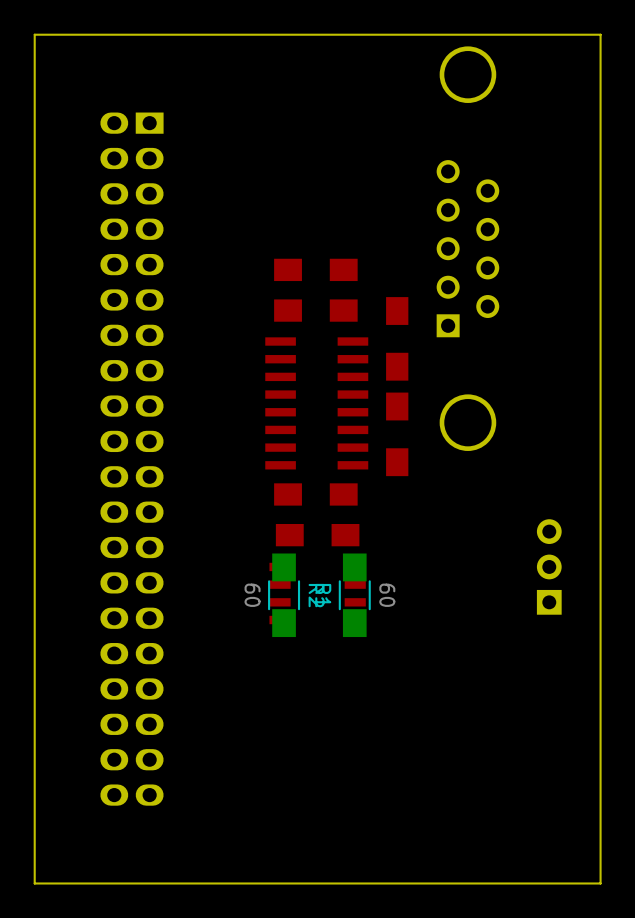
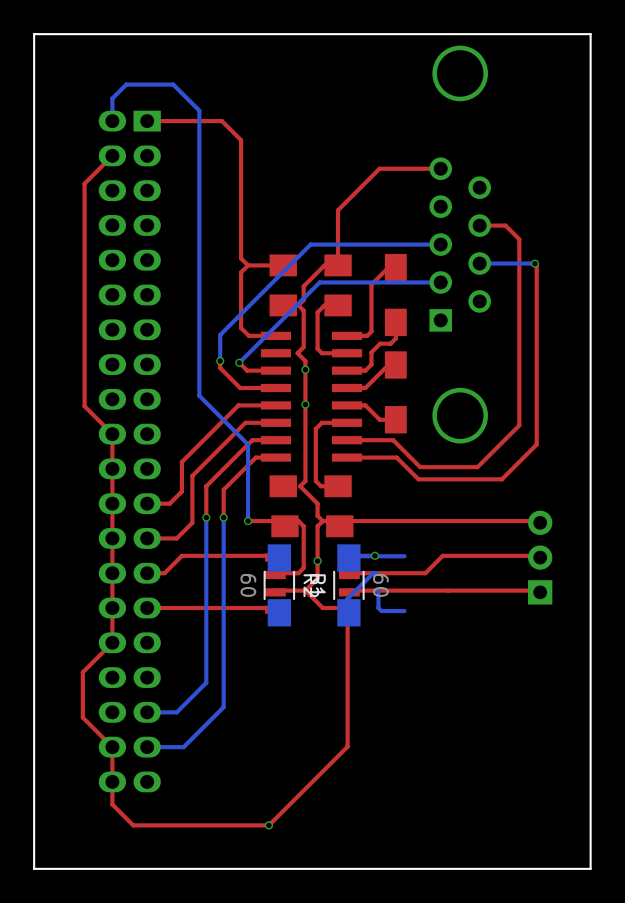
bottom track: none -> (112, 121) (112, 98) (126, 84) (173, 84) (199, 110) (199, 395) (248, 444) (248, 521)
top track: none -> (147, 121) (221, 121) (241, 140) (241, 258) (248, 265)
top track: none -> (112, 155) (84, 183) (84, 406) (112, 434) (112, 642) (82, 672) (82, 717) (112, 747) (112, 804) (133, 825) (268, 825) (347, 746) (347, 608) (322, 608) (305, 590)
top track: none -> (440, 168) (379, 168) (338, 210) (338, 265) (324, 265) (303, 286) (303, 300) (298, 305)
top track: none -> (479, 225) (505, 225) (519, 239) (519, 425) (477, 467) (420, 467) (393, 440) (347, 440)
bottom track: none -> (440, 244) (310, 244) (220, 334) (220, 361)
bottom track: none -> (534, 263) (479, 263)
top track: none -> (534, 263) (536, 265) (536, 444) (501, 479) (418, 479) (396, 457) (347, 457)
via: none -> (534, 263)
top track: none -> (248, 265) (241, 272) (241, 328) (248, 335) (275, 335)
top track: none -> (283, 265) (248, 265)
top track: none -> (395, 267) (388, 267) (371, 284) (371, 331) (367, 335) (347, 335)
bottom track: none -> (440, 282) (319, 282) (239, 362)
part: none -> (395, 294)
top track: none -> (298, 305) (303, 310) (303, 347) (297, 353) (305, 361) (305, 481) (300, 486) (317, 503) (317, 515) (322, 521)
top track: none -> (338, 305) (324, 305) (317, 312) (317, 348) (321, 353) (347, 353)
top track: none -> (395, 322) (395, 338) (390, 343) (380, 343) (371, 352) (371, 364) (365, 370) (347, 370)
part: (397, 338) -> none
top track: none -> (220, 361) (220, 368) (240, 388) (275, 388)
via: none -> (220, 361)
top track: none -> (239, 362) (247, 370) (275, 370)
via: none -> (239, 362)
top track: none -> (395, 364) (388, 364) (365, 388) (347, 388)
via: none -> (305, 369)
part: none -> (395, 392)
via: none -> (305, 404)
top track: none -> (275, 405) (238, 405) (181, 461) (181, 491) (169, 503) (147, 503)
top track: none -> (347, 405) (365, 405) (379, 419) (395, 419)
top track: none -> (275, 422) (245, 422) (192, 475) (192, 522) (176, 538) (147, 538)
top track: none -> (347, 422) (321, 422) (315, 428) (315, 481) (321, 486) (338, 486)
part: (397, 434) -> none
top track: none -> (275, 440) (252, 440) (206, 486) (206, 517)
top track: none -> (275, 457) (255, 457) (223, 489) (223, 517)
bottom track: none -> (206, 517) (206, 682) (176, 712) (147, 712)
via: none -> (206, 517)
bottom track: none -> (223, 517) (223, 707) (183, 747) (147, 747)
via: none -> (223, 517)
top track: none -> (248, 521) (298, 521) (303, 526) (303, 568) (298, 573) (273, 573)
via: none -> (248, 521)
top track: none -> (322, 521) (317, 526) (317, 578) (305, 590)
top track: none -> (547, 521) (322, 521)
top track: none -> (273, 555) (181, 555) (164, 573) (147, 573)
via: none -> (374, 555)
bottom track: none -> (404, 556) (347, 556)
top track: none -> (547, 555) (442, 555) (425, 573) (347, 573)
via: none -> (317, 561)
bottom track: none -> (376, 573) (373, 573) (347, 599) (347, 611)
top track: none -> (305, 590) (273, 590)
bottom track: none -> (378, 590) (378, 608) (381, 611) (404, 611)
top track: none -> (547, 590) (347, 590)
top track: none -> (273, 608) (147, 608)
via: none -> (268, 825)

